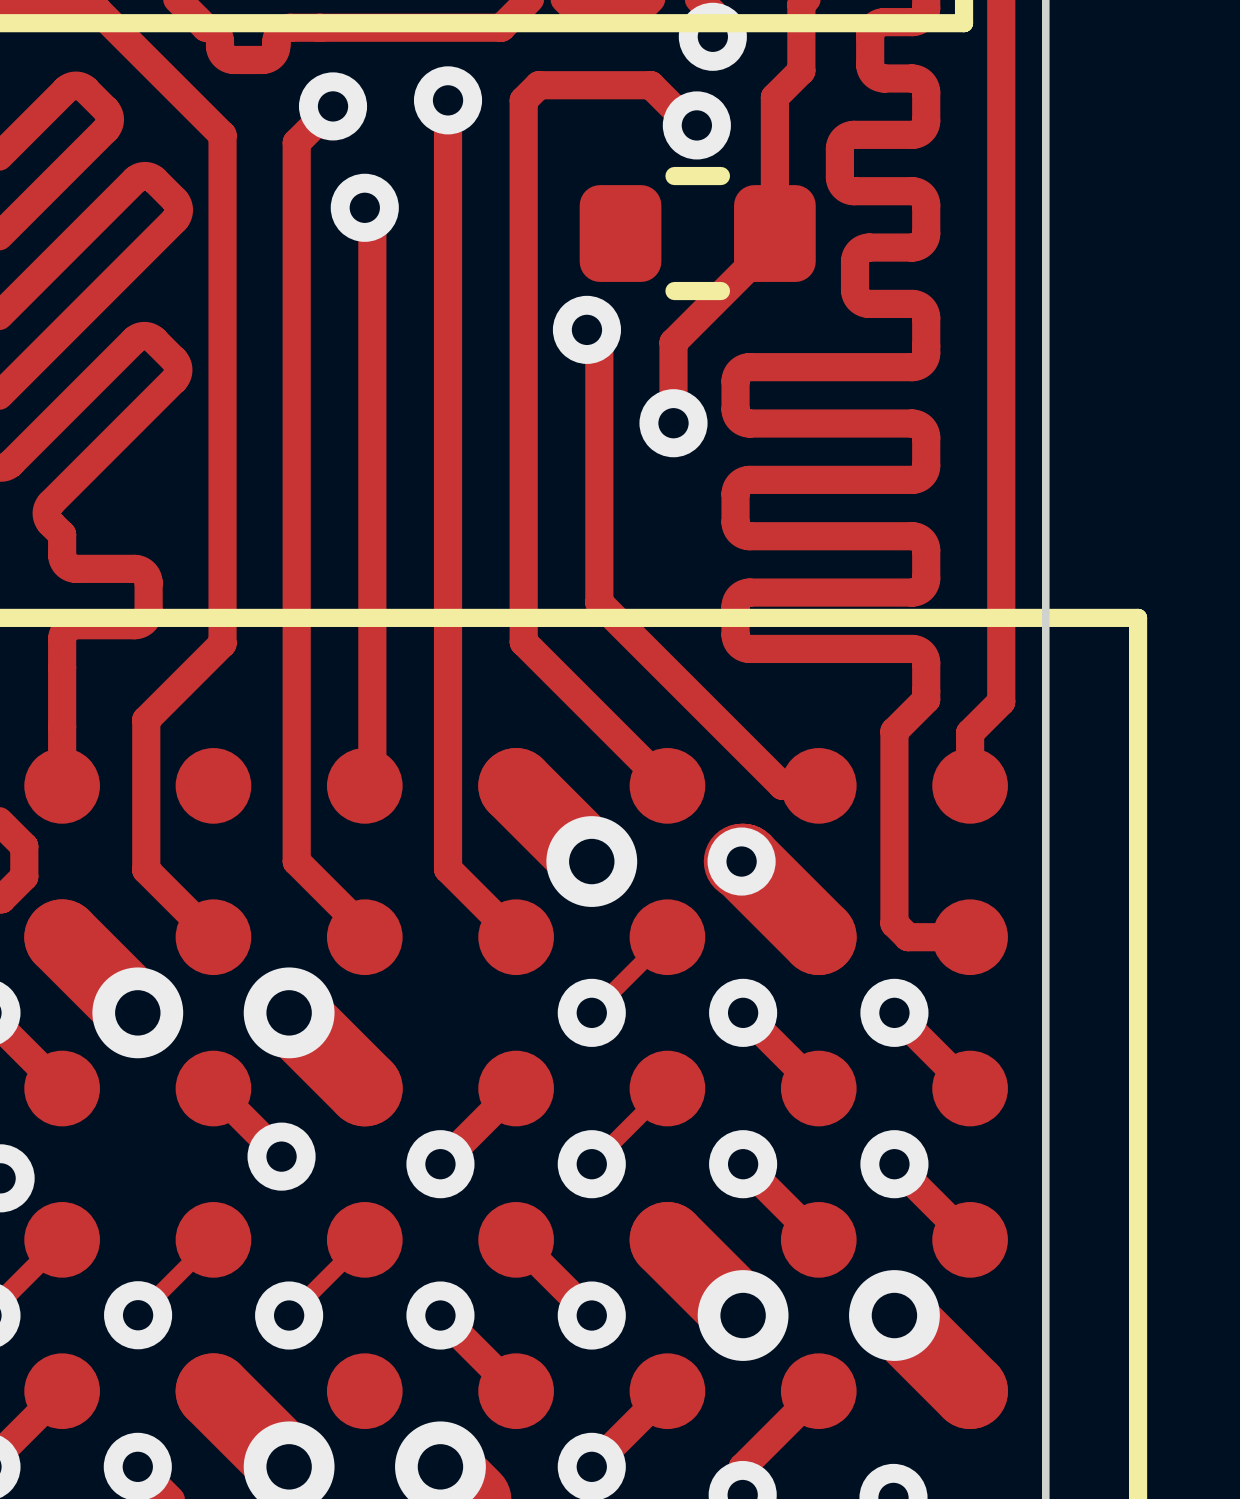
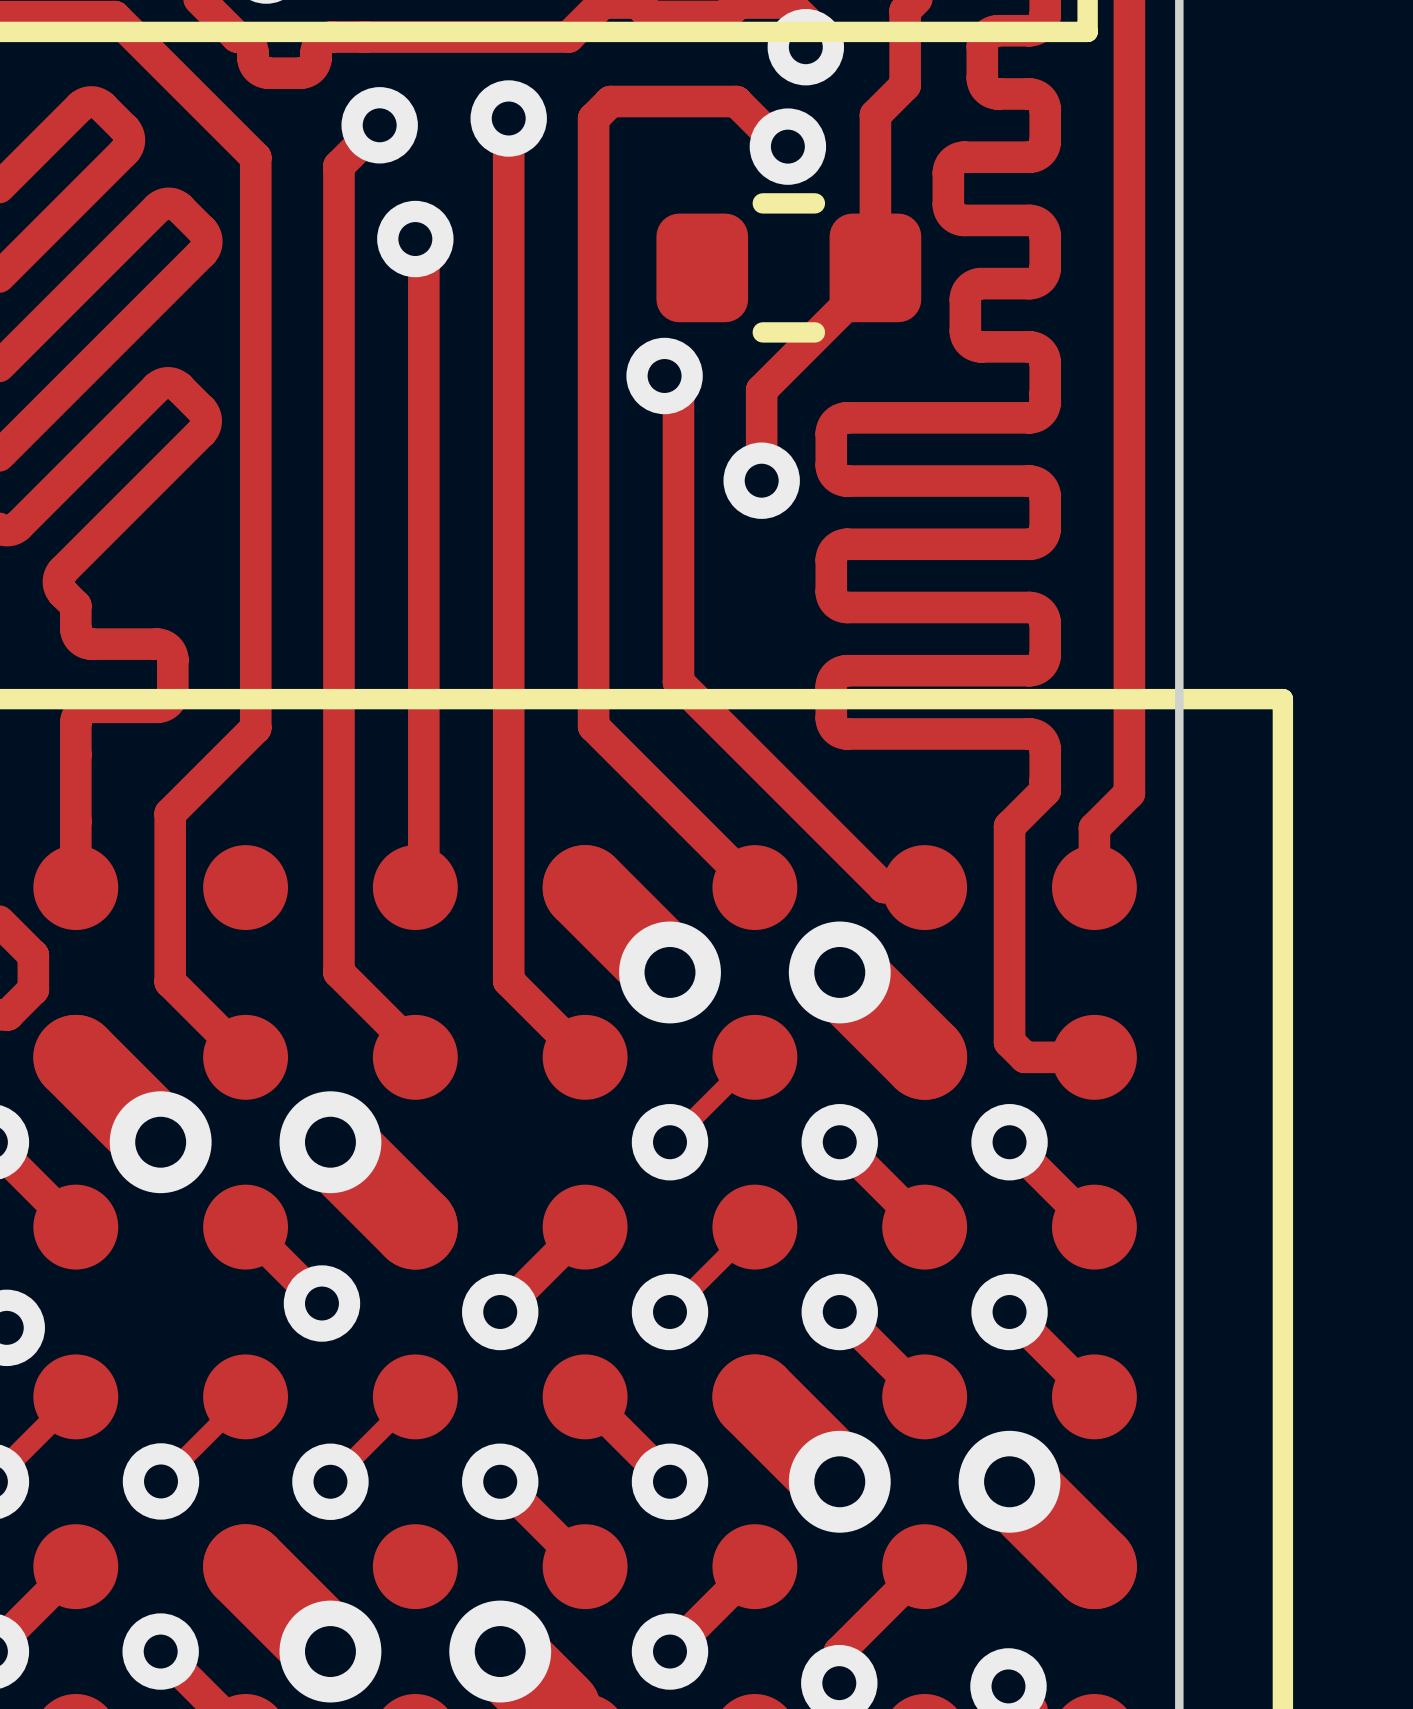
via size: [707, 827, 776, 896] -> [788, 921, 891, 1024]

